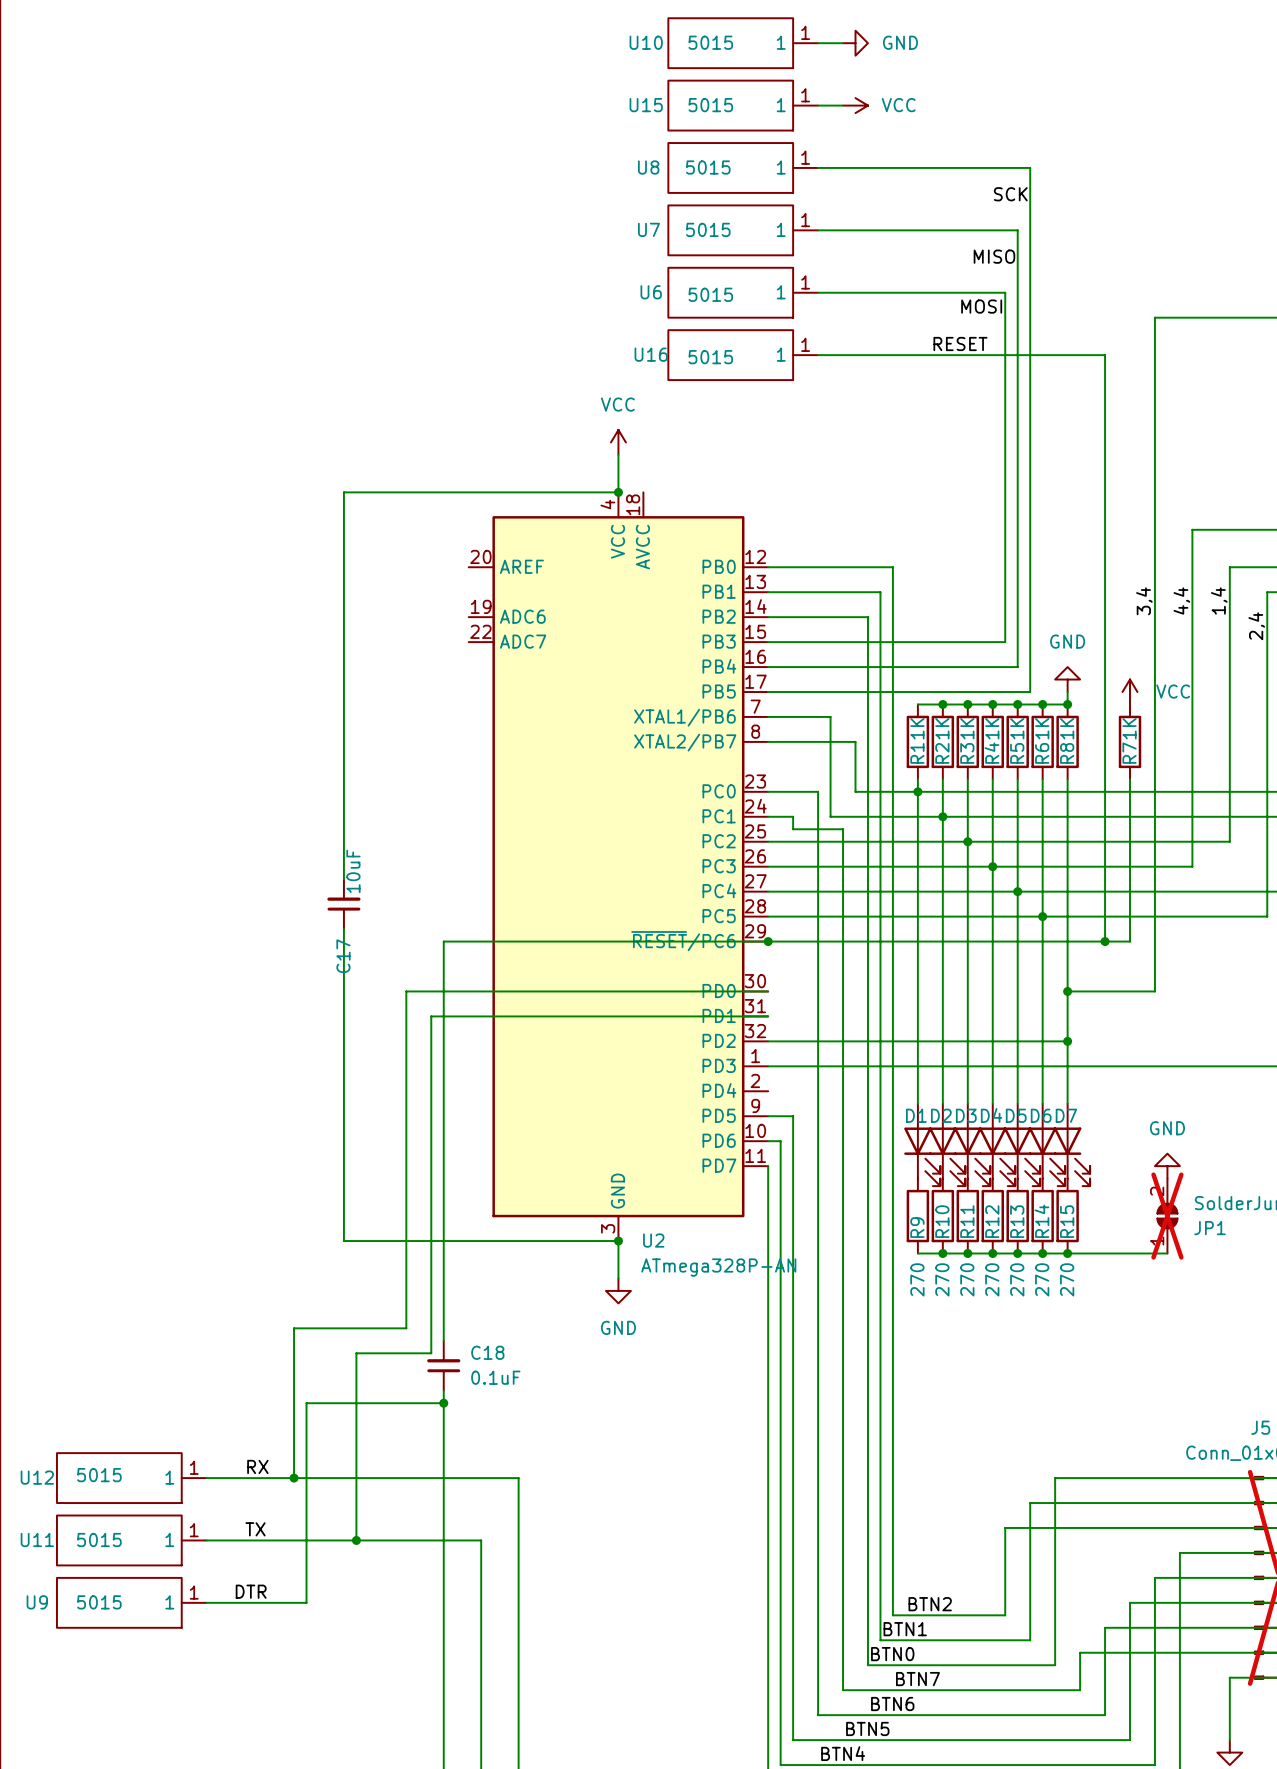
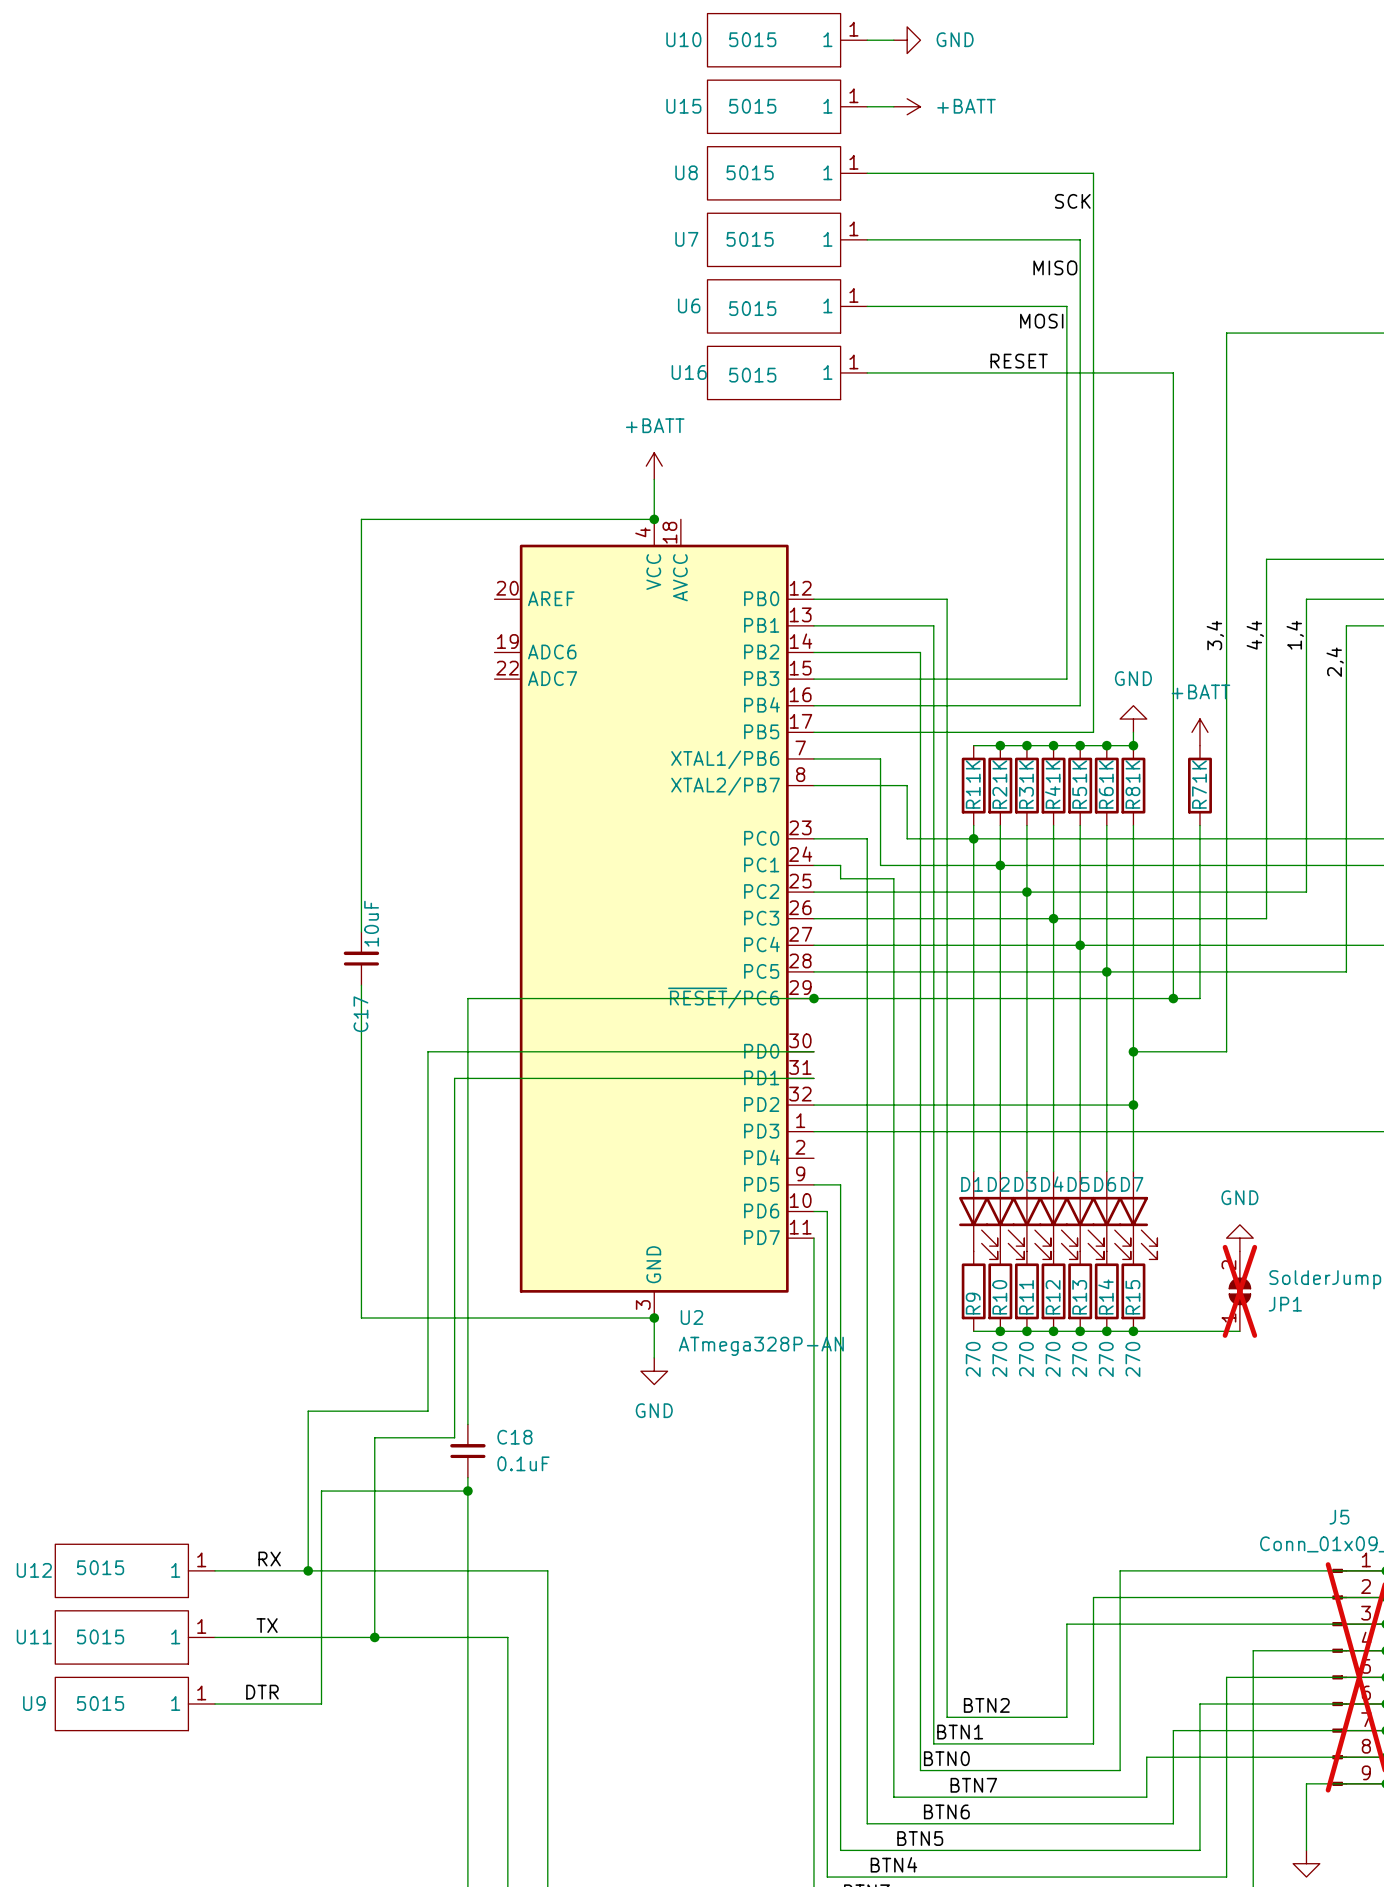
power symbol: VCC (855, 105) -> +BATT (907, 106)
power symbol: VCC (618, 442) -> +BATT (654, 466)
power symbol: VCC (1130, 692) -> +BATT (1199, 732)

